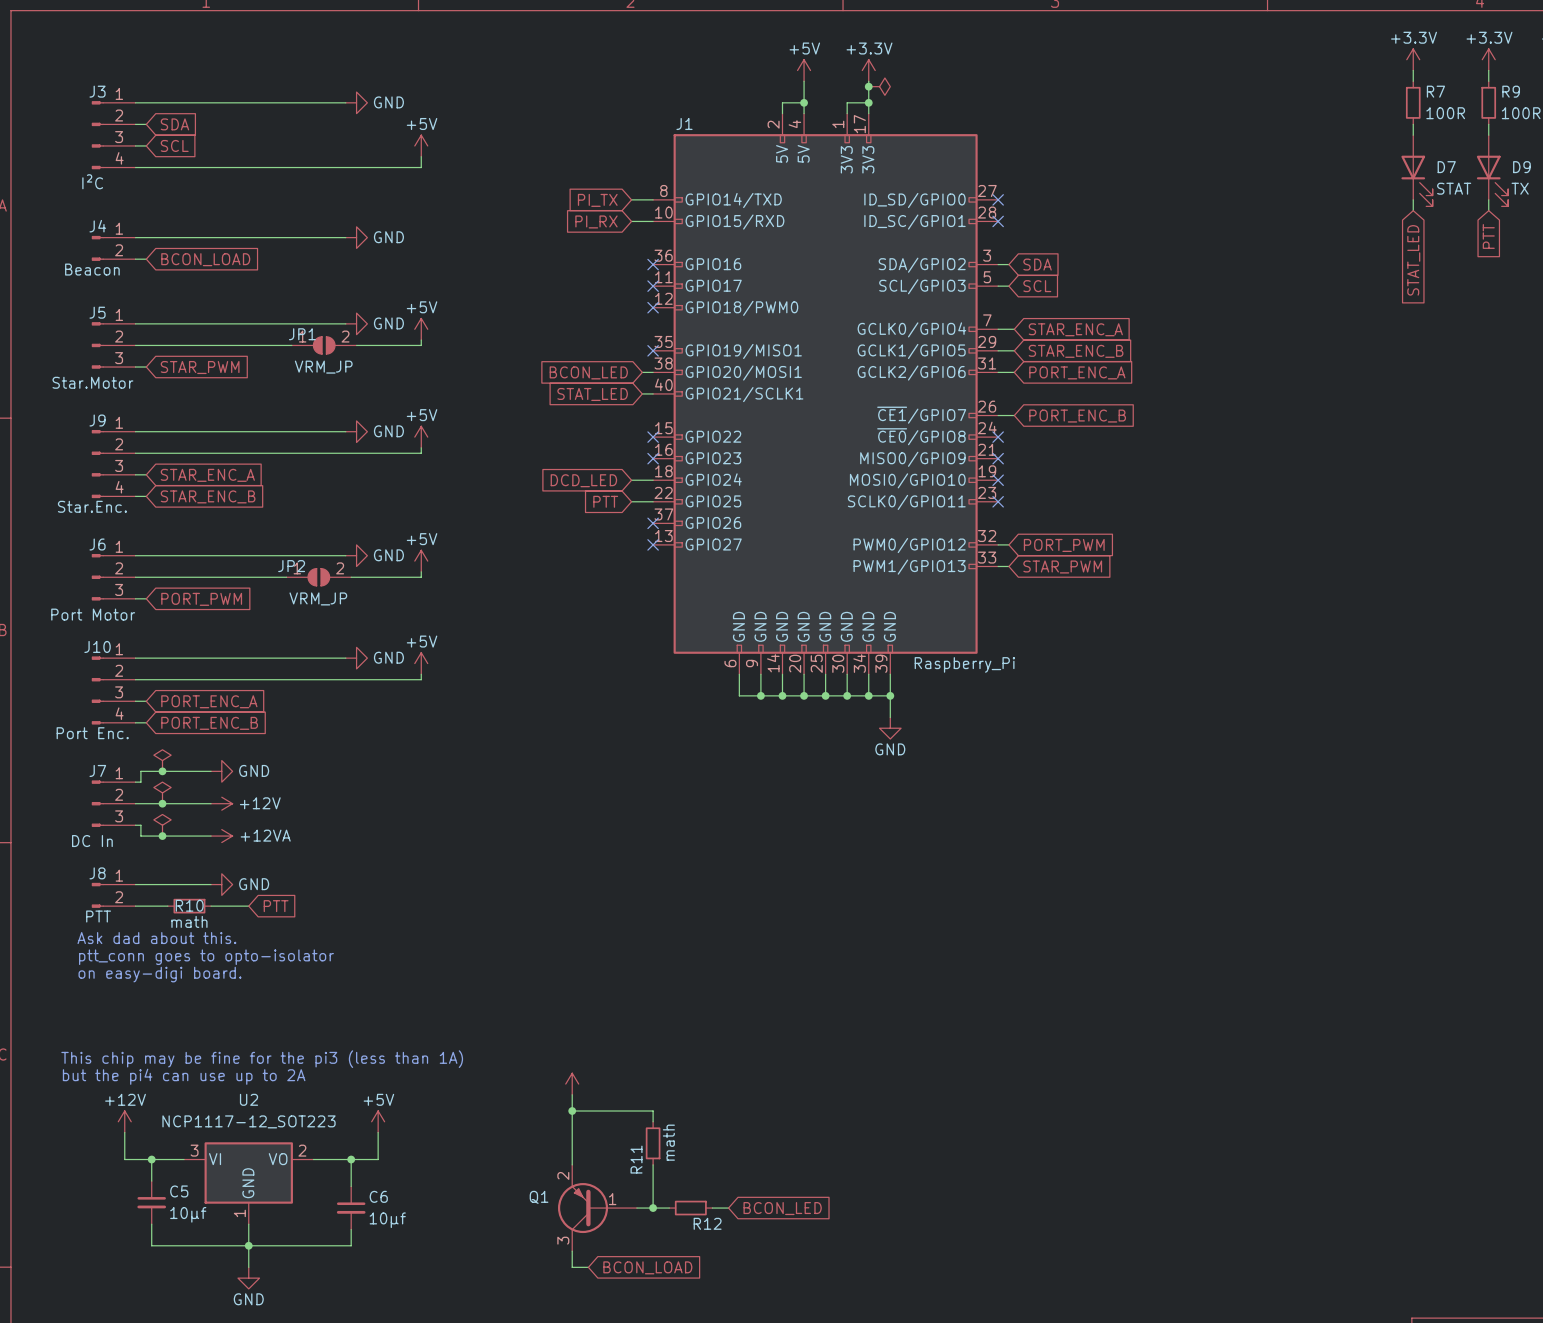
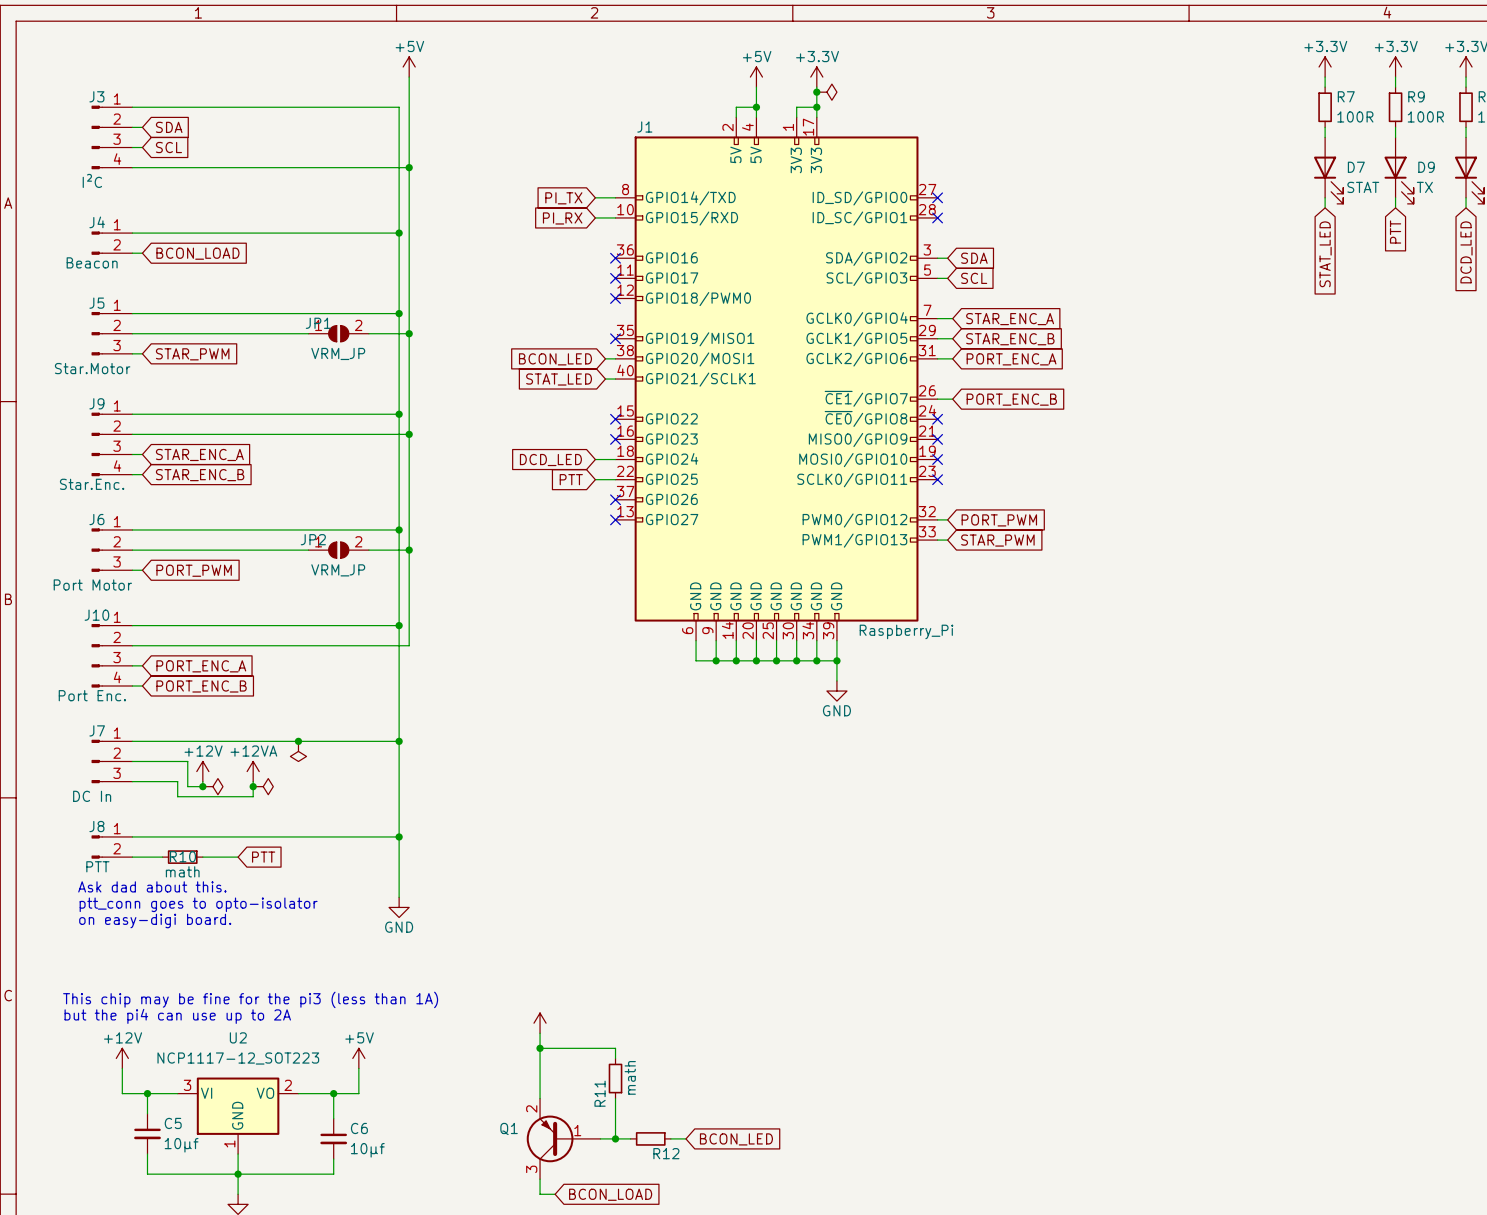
wire: none -> (409, 77) (409, 645) (399, 645) (399, 897)
wire: none -> (328, 107) (399, 107) (399, 157)
power symbol: GND (356, 102) -> none
power symbol position: +5V (421, 145) -> +5V (409, 67)
wire: none -> (409, 167) (399, 167) (399, 328)
junction: none -> (409, 167)
wire: none -> (328, 233) (399, 233)
power symbol: GND (356, 237) -> none
junction: none -> (399, 233)
wire: none -> (328, 313) (399, 313)
power symbol: GND (356, 323) -> none
junction: none -> (399, 313)
power symbol: +5V (421, 329) -> none
JP1 position: (324, 345) -> (338, 333)
wire: none -> (409, 333) (399, 333) (399, 414)
junction: none -> (409, 333)
wire: none -> (328, 414) (399, 414)
power symbol: GND (356, 431) -> none
junction: none -> (399, 414)
power symbol: +5V (421, 437) -> none
wire: none -> (409, 434) (399, 434) (399, 545)
junction: none -> (409, 434)
wire: none -> (328, 529) (399, 529)
power symbol: GND (356, 555) -> none
junction: none -> (399, 529)
power symbol: +5V (421, 561) -> none
JP2 position: (318, 577) -> (338, 550)
wire: none -> (409, 550) (399, 550) (399, 640)
junction: none -> (409, 550)
wire: none -> (328, 625) (399, 625)
power symbol: GND (356, 658) -> none
junction: none -> (399, 625)
power symbol: +5V (421, 663) -> none
power symbol: (162, 760) -> none
junction: (162, 771) -> none
wire: (211, 771) (140, 771) (140, 782) -> (399, 741) (137, 741)
power symbol: GND (221, 771) -> none
junction: none -> (298, 741)
junction: none -> (399, 741)
power symbol: (162, 792) -> none
power symbol: none -> (298, 751)
junction: (162, 803) -> none
wire: (194, 803) (211, 803) -> (187, 761) (187, 786) (202, 786) (202, 781)
power symbol rotation: 0° (221, 803) -> 90° counterclockwise (202, 771)
power symbol position: +12V (221, 803) -> +12V (202, 771)
power symbol: none -> +12VA (253, 771)
wire: (140, 825) (140, 836) (211, 836) -> (137, 781) (177, 781) (177, 796) (253, 796) (253, 781)
power symbol: (162, 825) -> none
power symbol shape: [211, 829, 233, 843] -> [202, 778, 223, 795]
junction: none -> (202, 786)
junction: none -> (253, 786)
power symbol: none -> (263, 786)
power symbol text: +12VA (265, 835) -> none
junction: (162, 836) -> none
wire: none -> (202, 836) (399, 836)
power symbol: GND (221, 884) -> none
junction: none -> (399, 836)
power symbol: none -> GND (399, 907)

